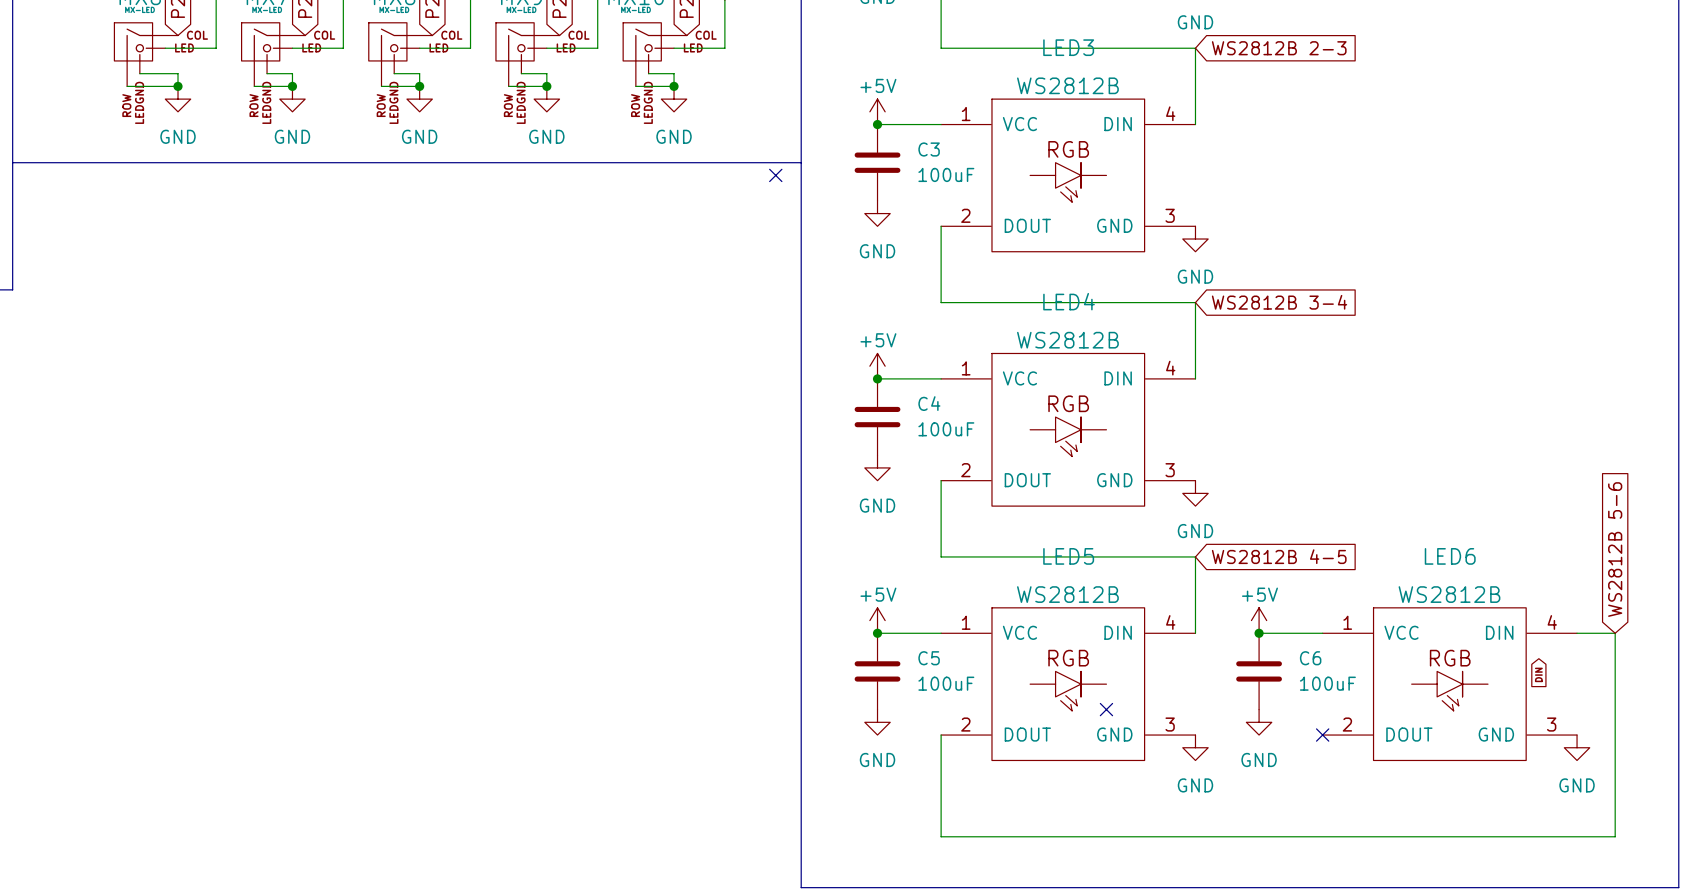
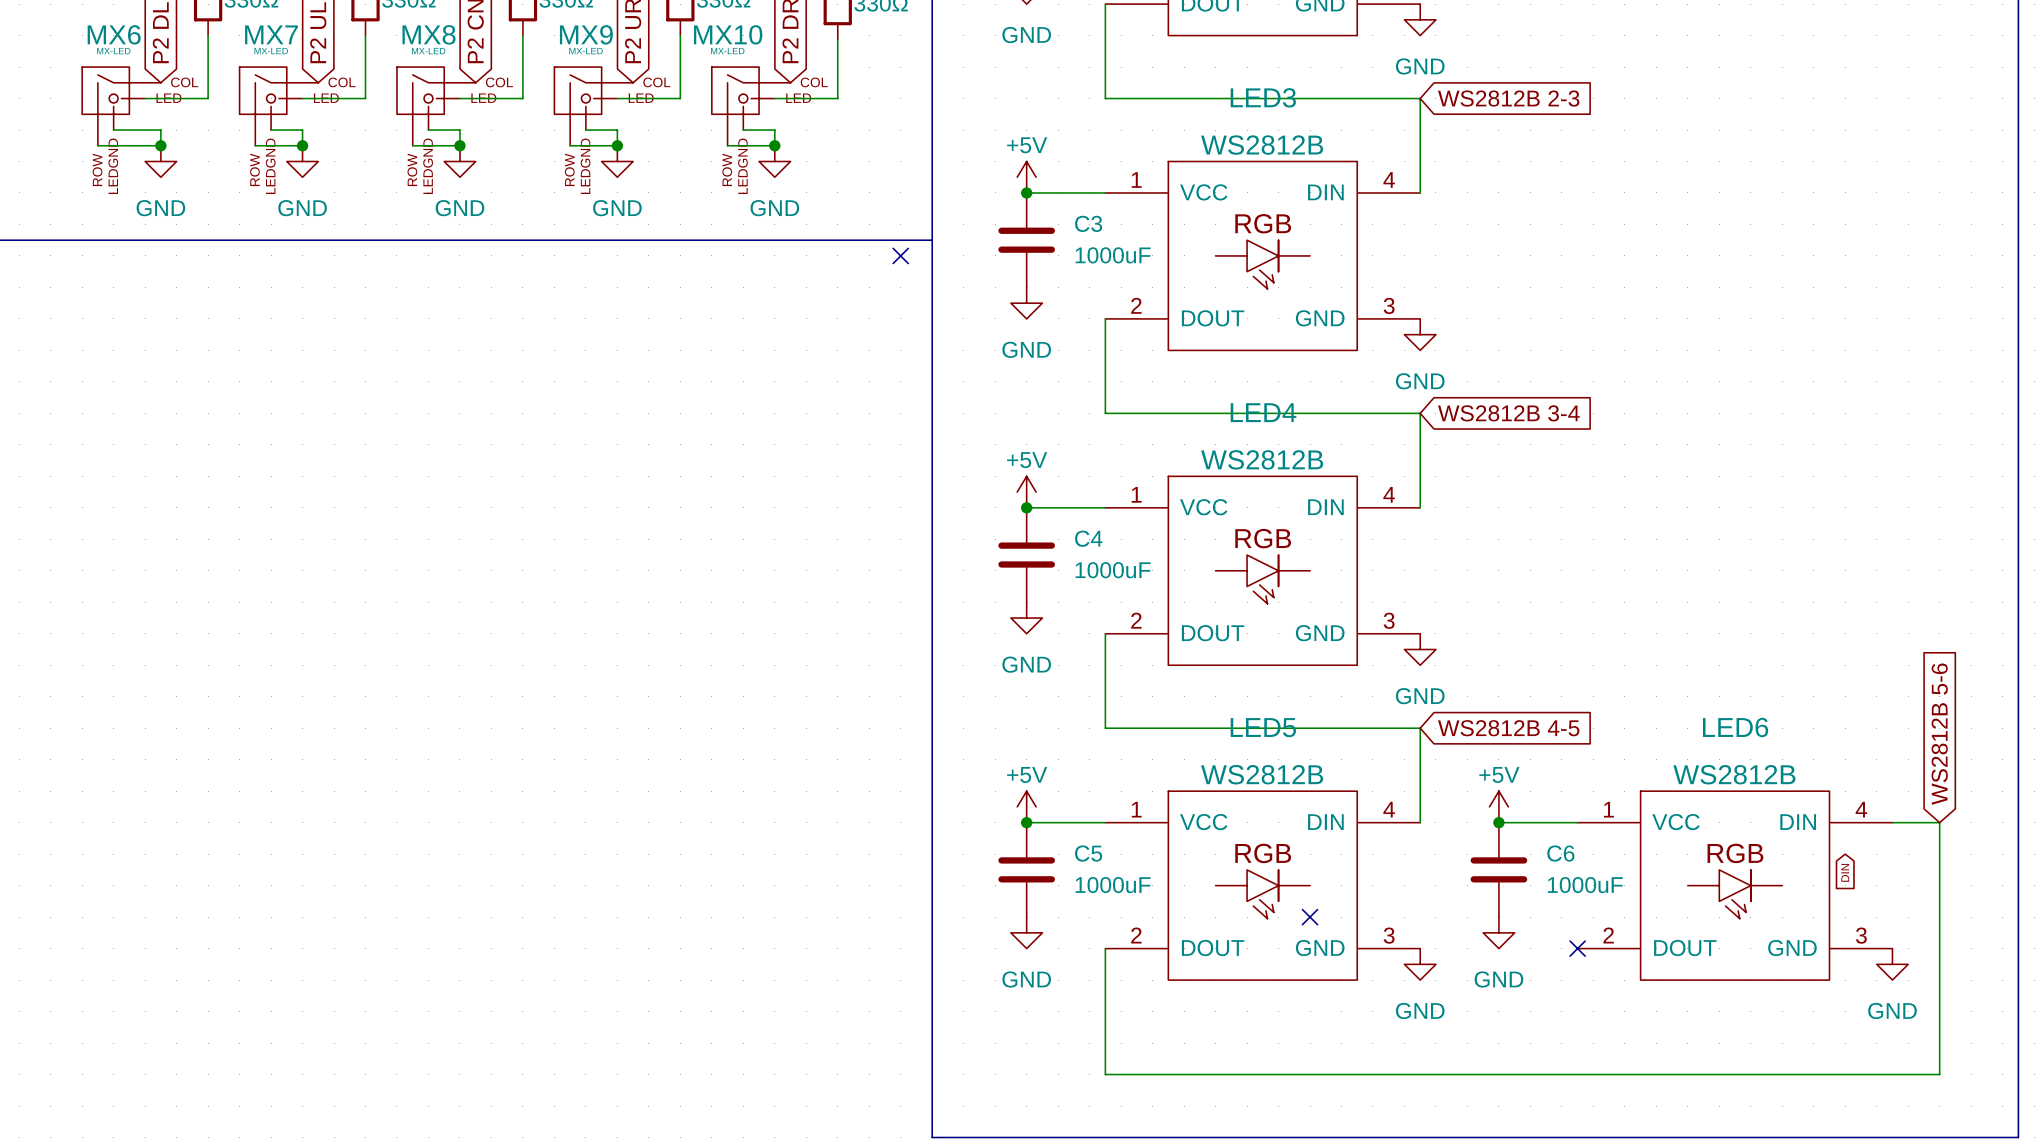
C3 value: 100uF (946, 174) -> 1000uF (1113, 255)
C4 value: 100uF (946, 429) -> 1000uF (1113, 570)
C5 value: 100uF (946, 683) -> 1000uF (1113, 885)
C6 value: 100uF (1327, 683) -> 1000uF (1585, 885)

